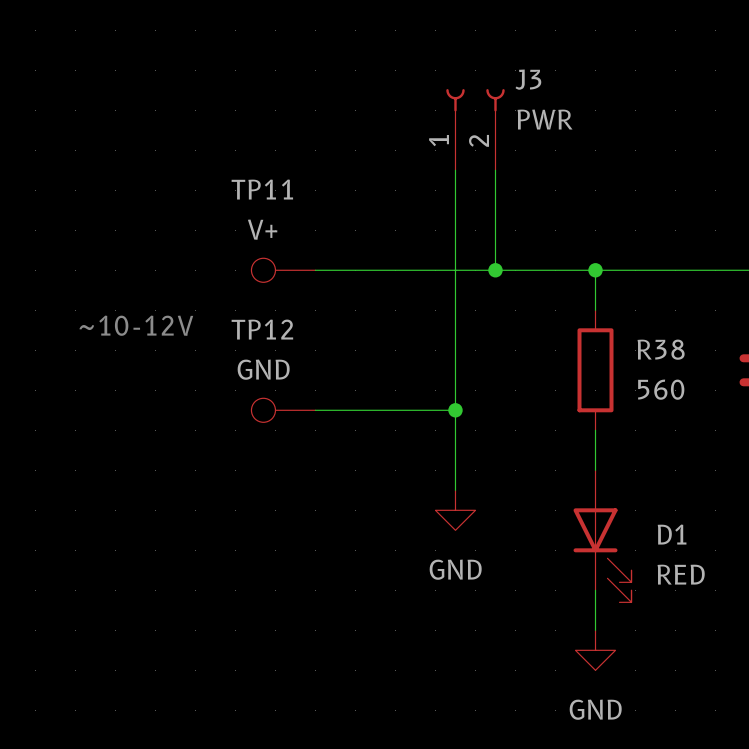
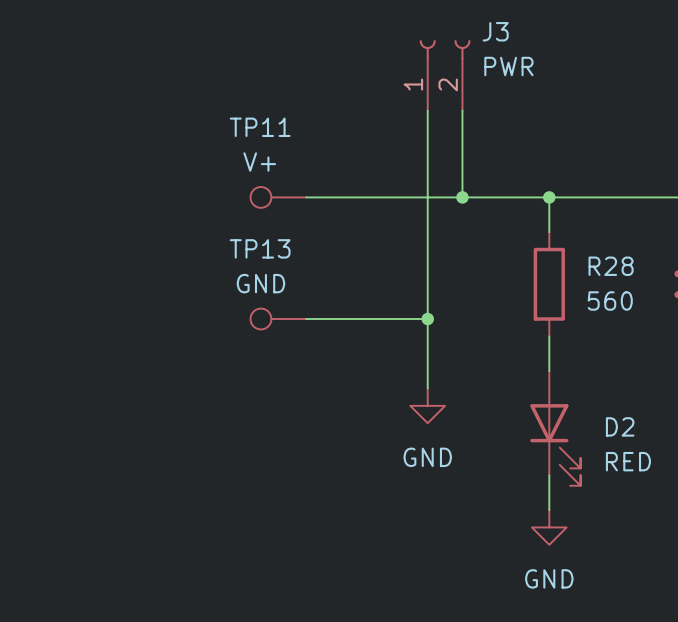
text: ~10-12V (136, 325) -> none
TP12 name: TP12 (262, 329) -> TP13 (260, 248)
R38 name: R38 (661, 349) -> R28 (611, 266)
D1 name: D1 (672, 534) -> D2 (620, 426)

